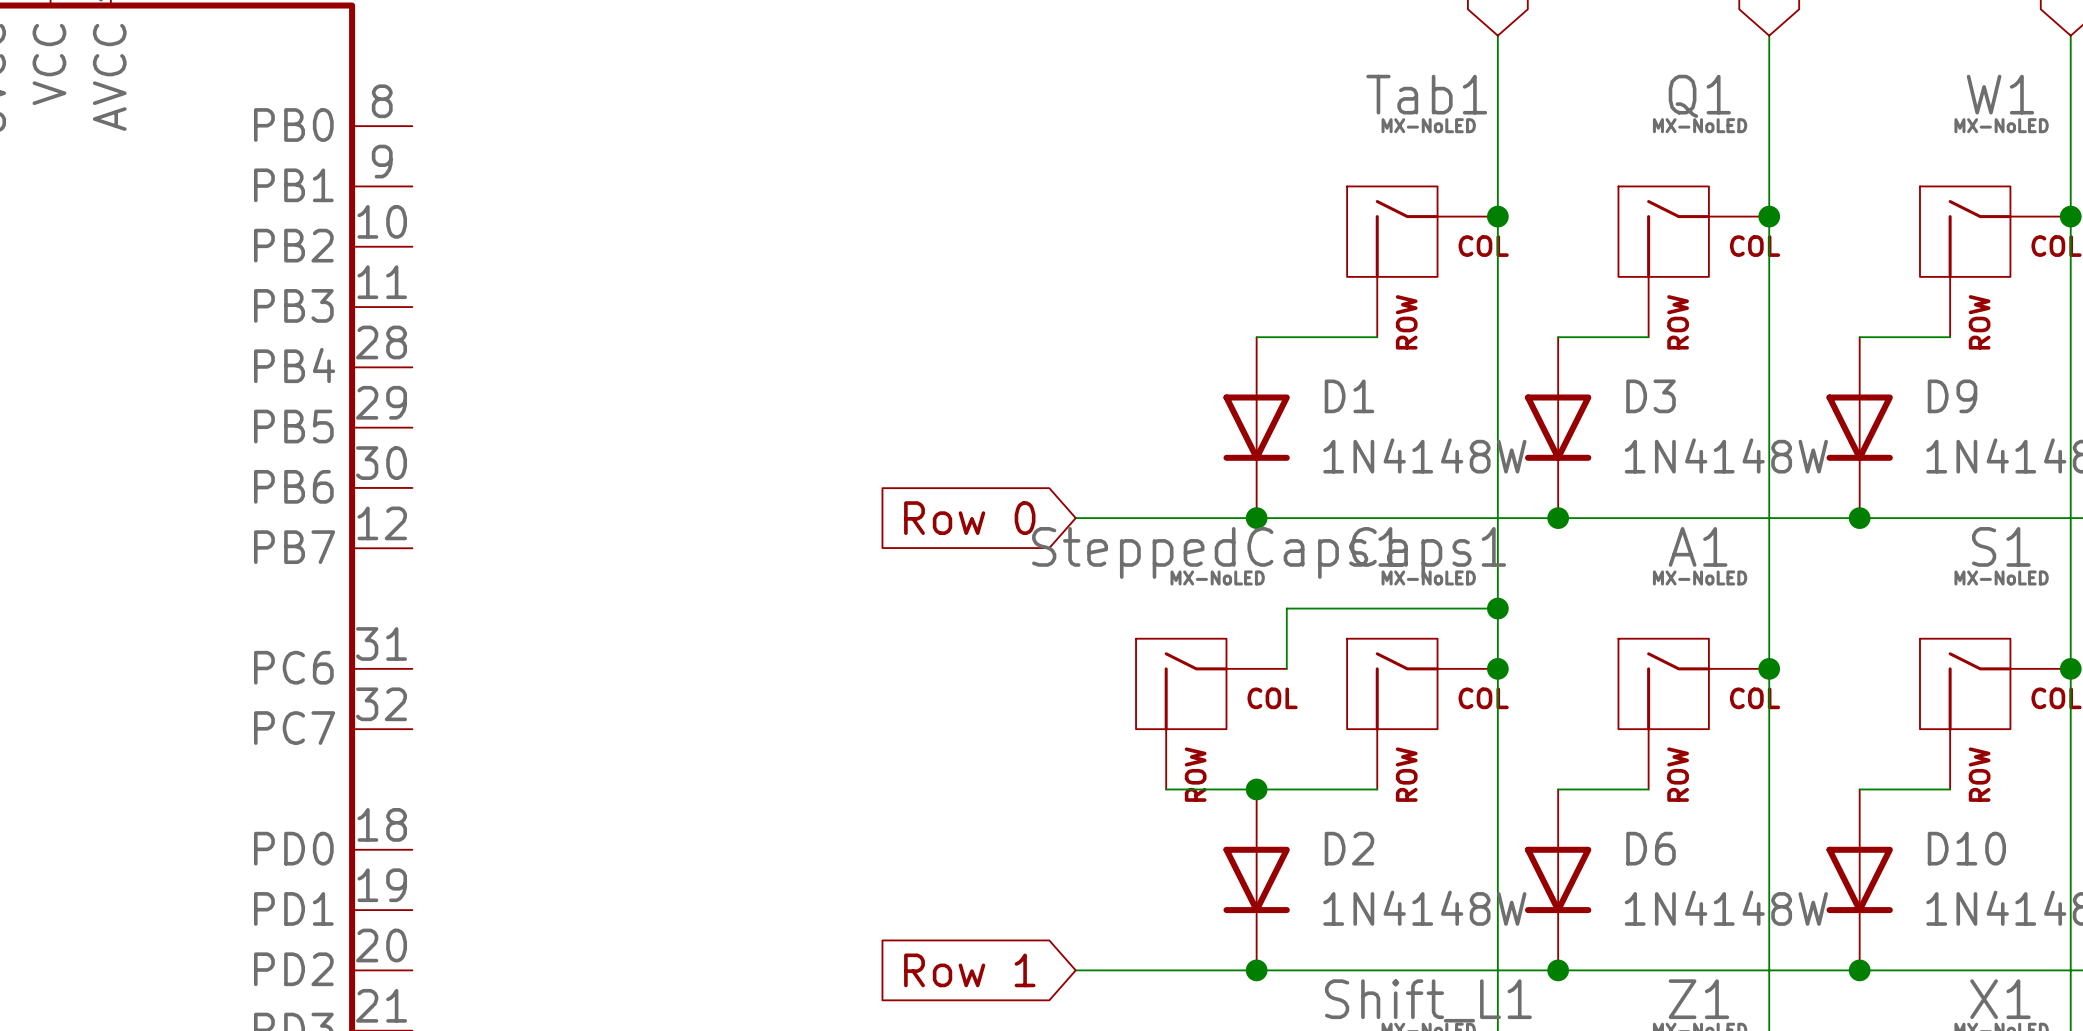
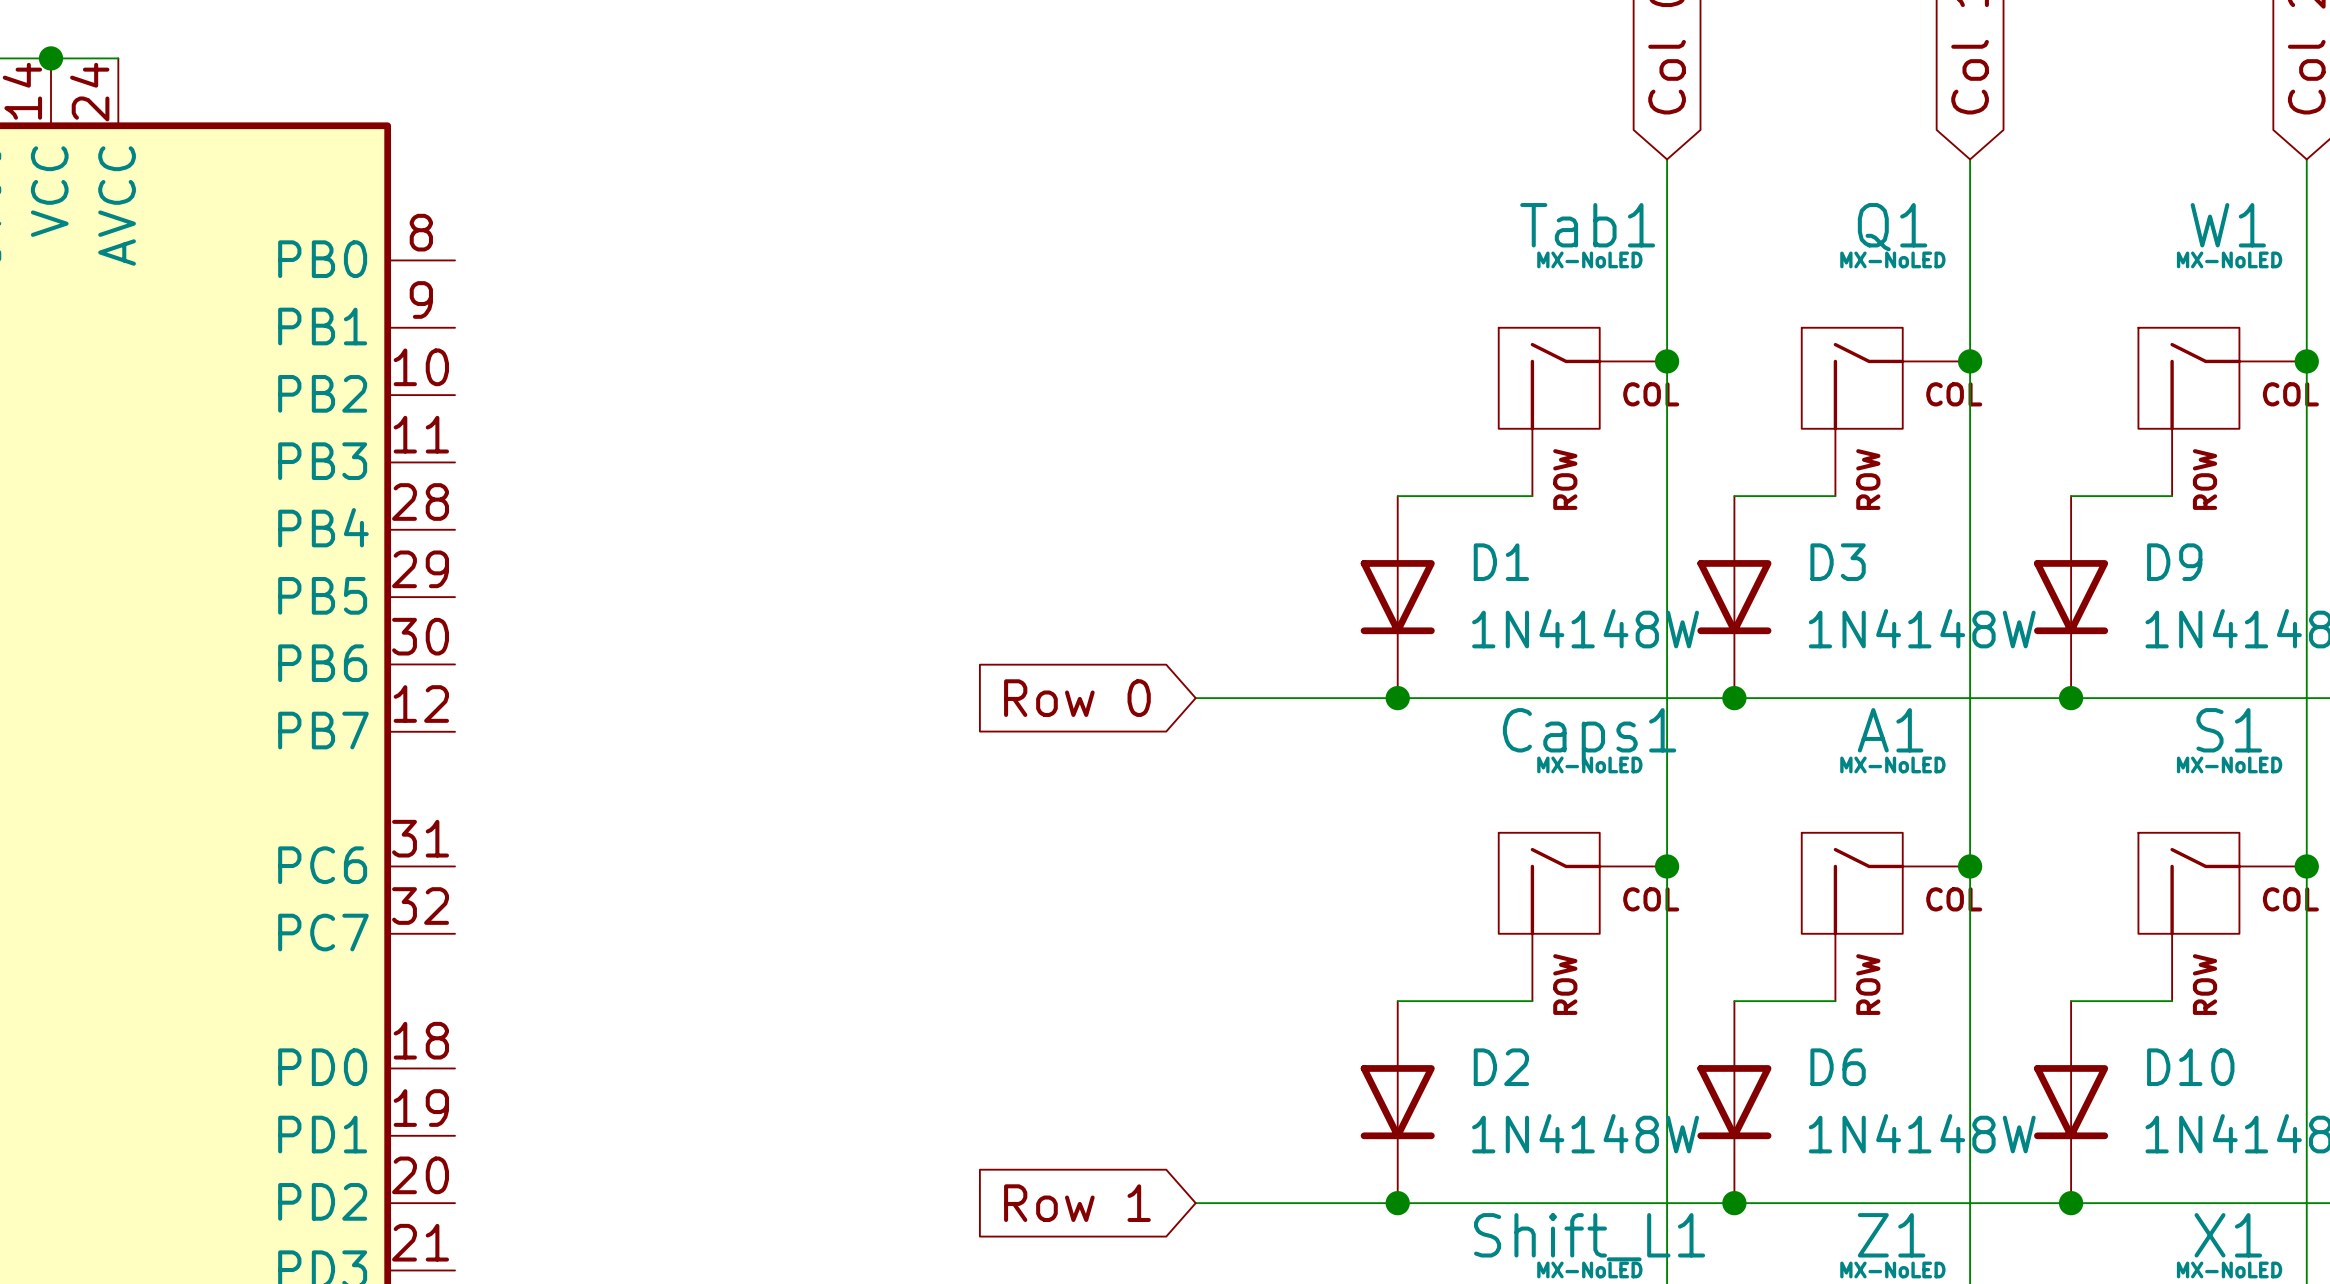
wire: (1497, 608) (1286, 608) (1286, 668) -> none
junction: (1497, 608) -> none
SteppedCaps1: MX-NoLED (1211, 714) -> none
wire: (1166, 789) (1256, 789) -> none
junction: (1256, 789) -> none

